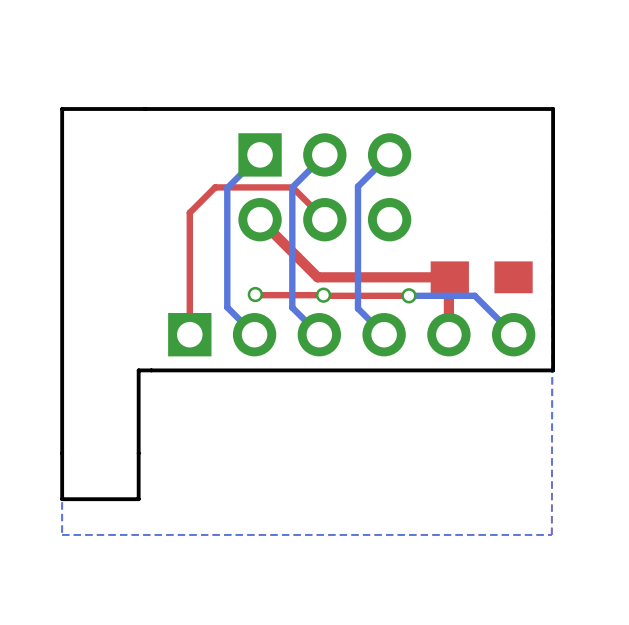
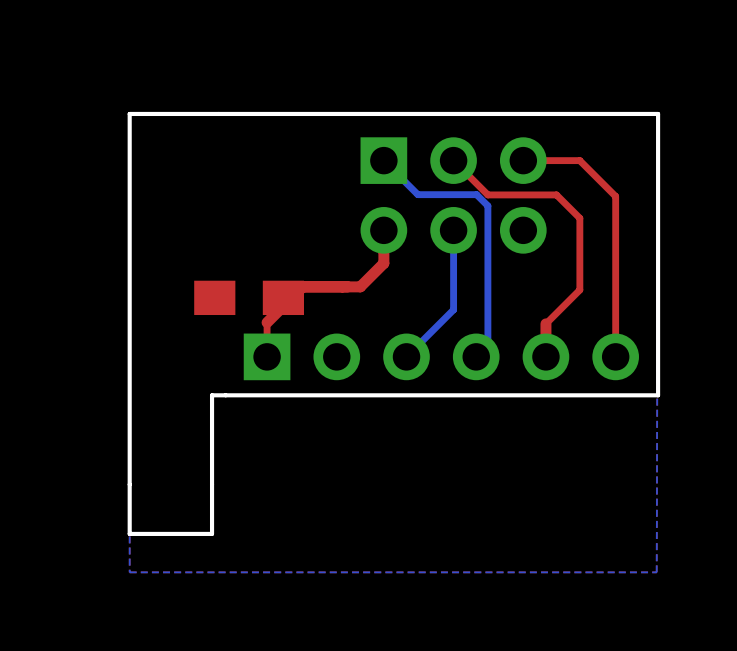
bottom track: none -> (383, 160) (417, 194) (476, 194) (487, 205) (487, 345)
top track: none -> (523, 160) (579, 160) (615, 196) (615, 356)
bottom track: (324, 154) (292, 187) (292, 307) (319, 334) -> (453, 230) (453, 309) (406, 356)
bottom track: (389, 154) (357, 186) (357, 308) (384, 334) -> none
bottom track: (260, 155) (227, 188) (227, 307) (254, 334) -> none
part position: (324, 187) -> (453, 195)
top track: (260, 219) (317, 277) (449, 277) (448, 304) -> (453, 160) (487, 194) (556, 194) (579, 218) (579, 289) (545, 323)
top track: (324, 219) (292, 187) (215, 187) (189, 212) (189, 302) -> (376, 237) (383, 230) (383, 263) (360, 286) (302, 286) (267, 322)
part position: (481, 277) -> (249, 297)
top track: (255, 294) (408, 295) -> none
via: (255, 294) -> none
via: (323, 295) -> none
bottom track: (408, 295) (474, 295) (513, 334) -> none
via: (408, 295) -> none

